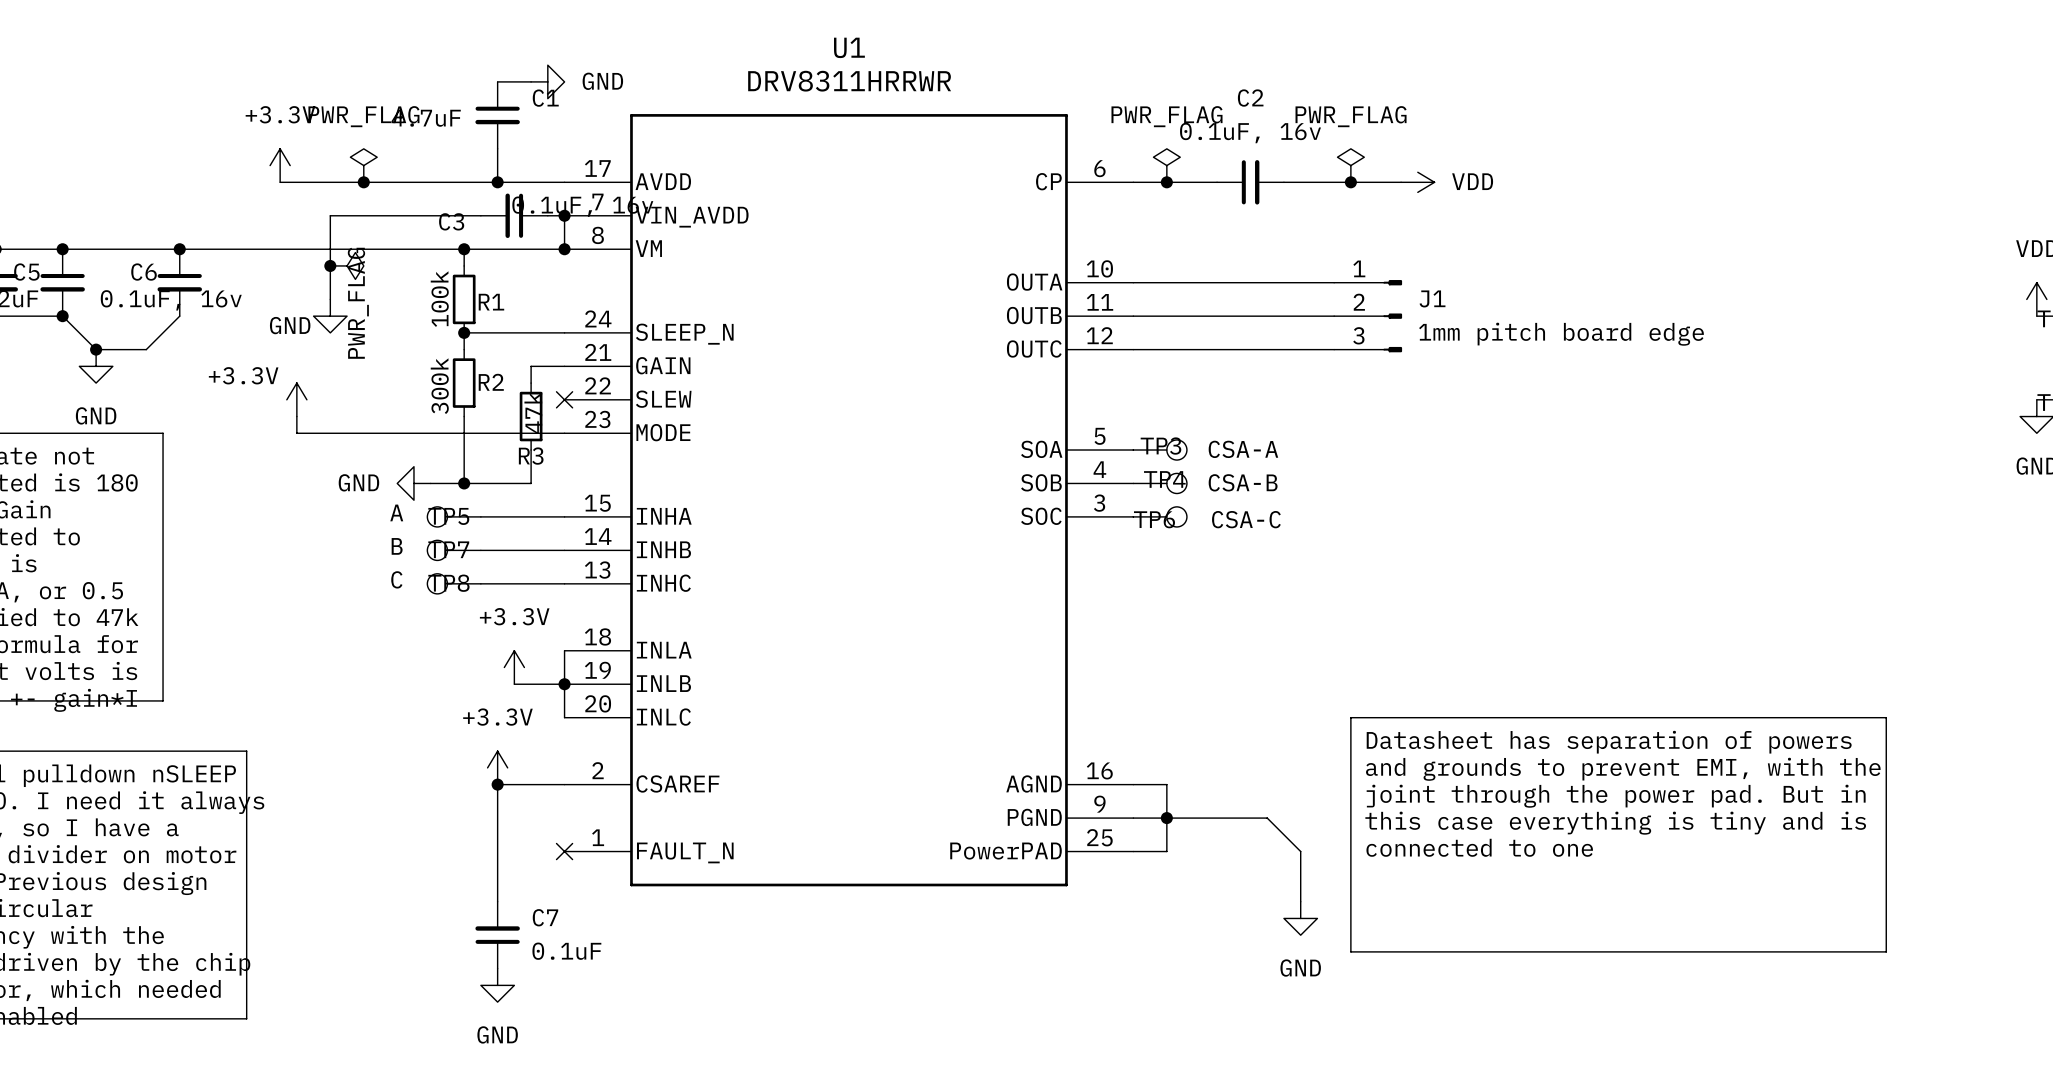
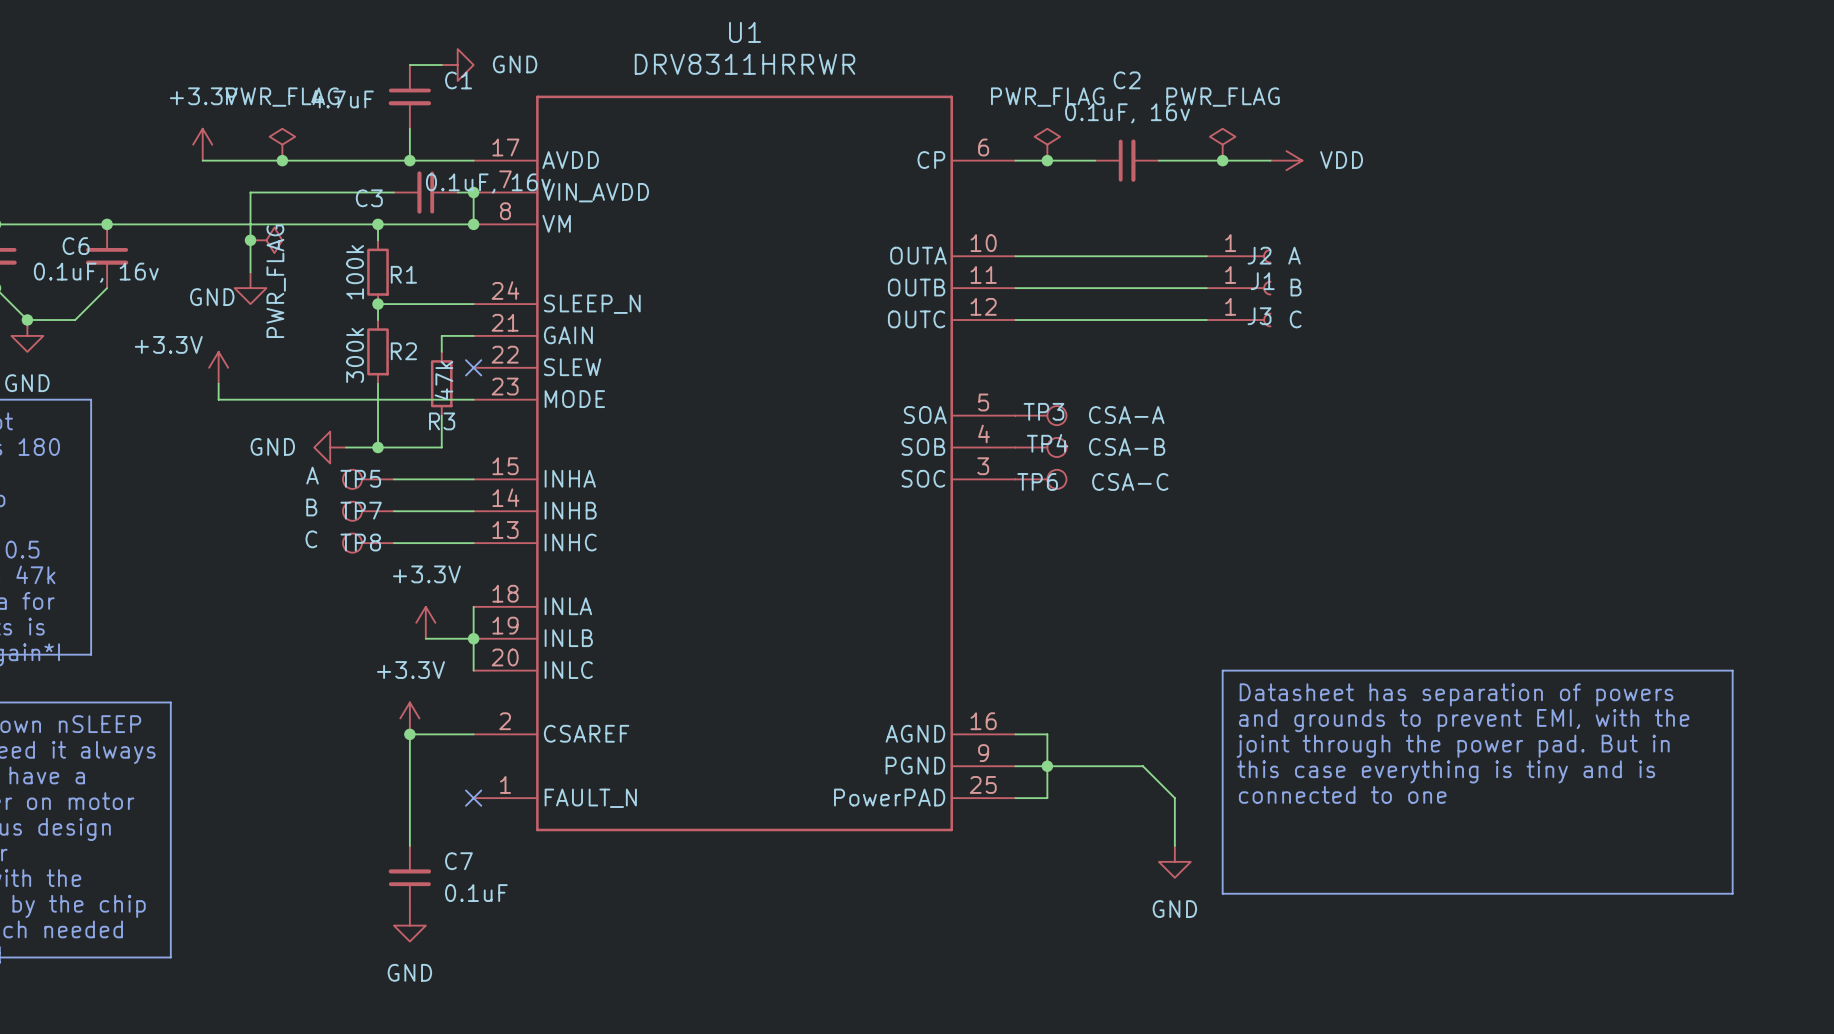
J1 symbol: [1334, 280, 1403, 353] -> [1206, 280, 1272, 296]
J2: none -> A (1239, 256)
J1 name position: J1 (1432, 298) -> J1 (1262, 281)
J1 value: 1mm pitch board edge (1561, 334) -> B (1296, 287)
J3: none -> C (1239, 320)

